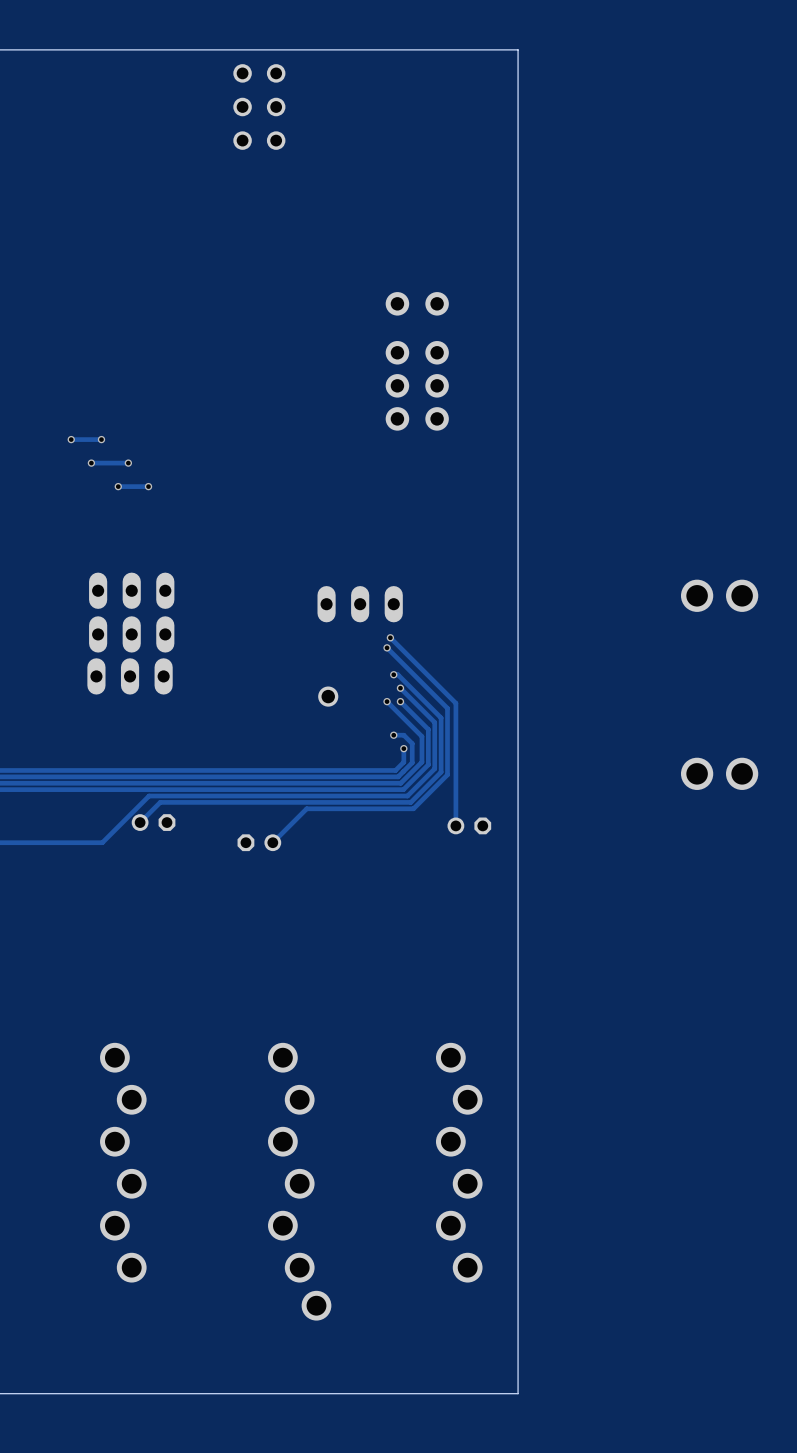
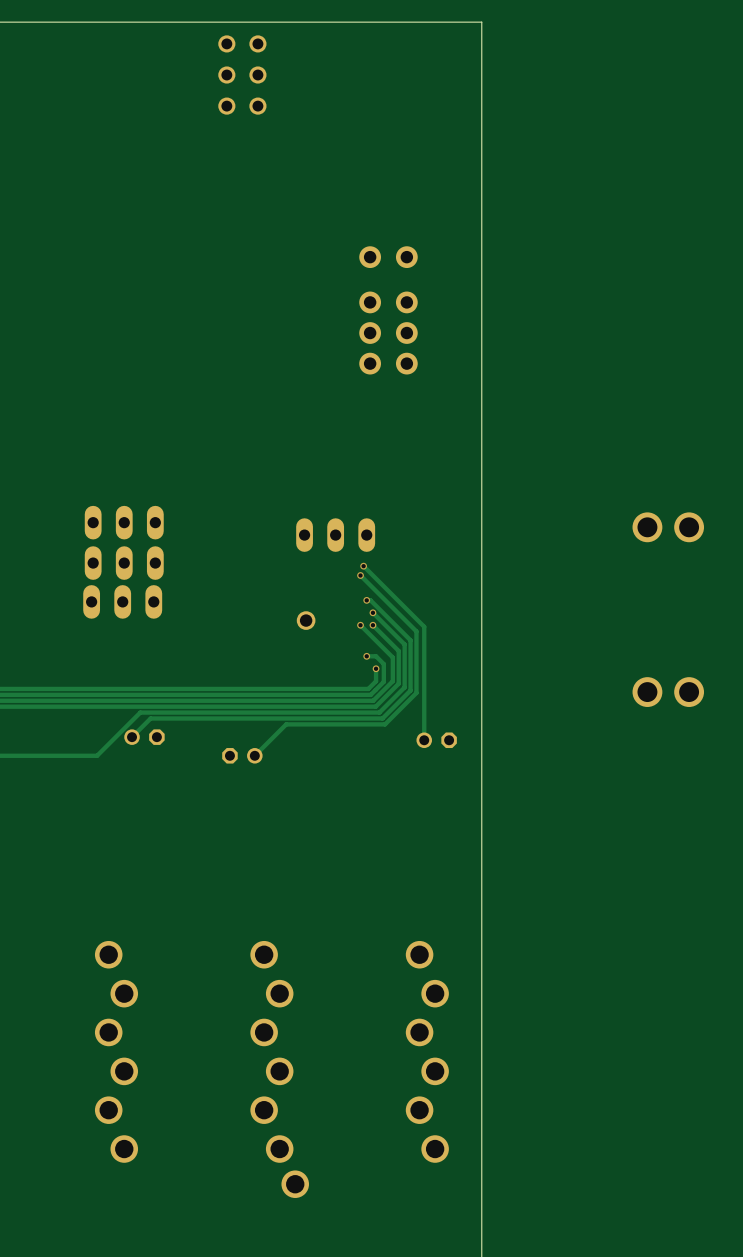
via: (71, 439) -> none
track: (101, 439) (71, 439) -> none
via: (101, 439) -> none
via: (91, 463) -> none
track: (128, 463) (91, 463) -> none
via: (128, 463) -> none
via: (118, 486) -> none
track: (148, 486) (118, 486) -> none
via: (148, 486) -> none

